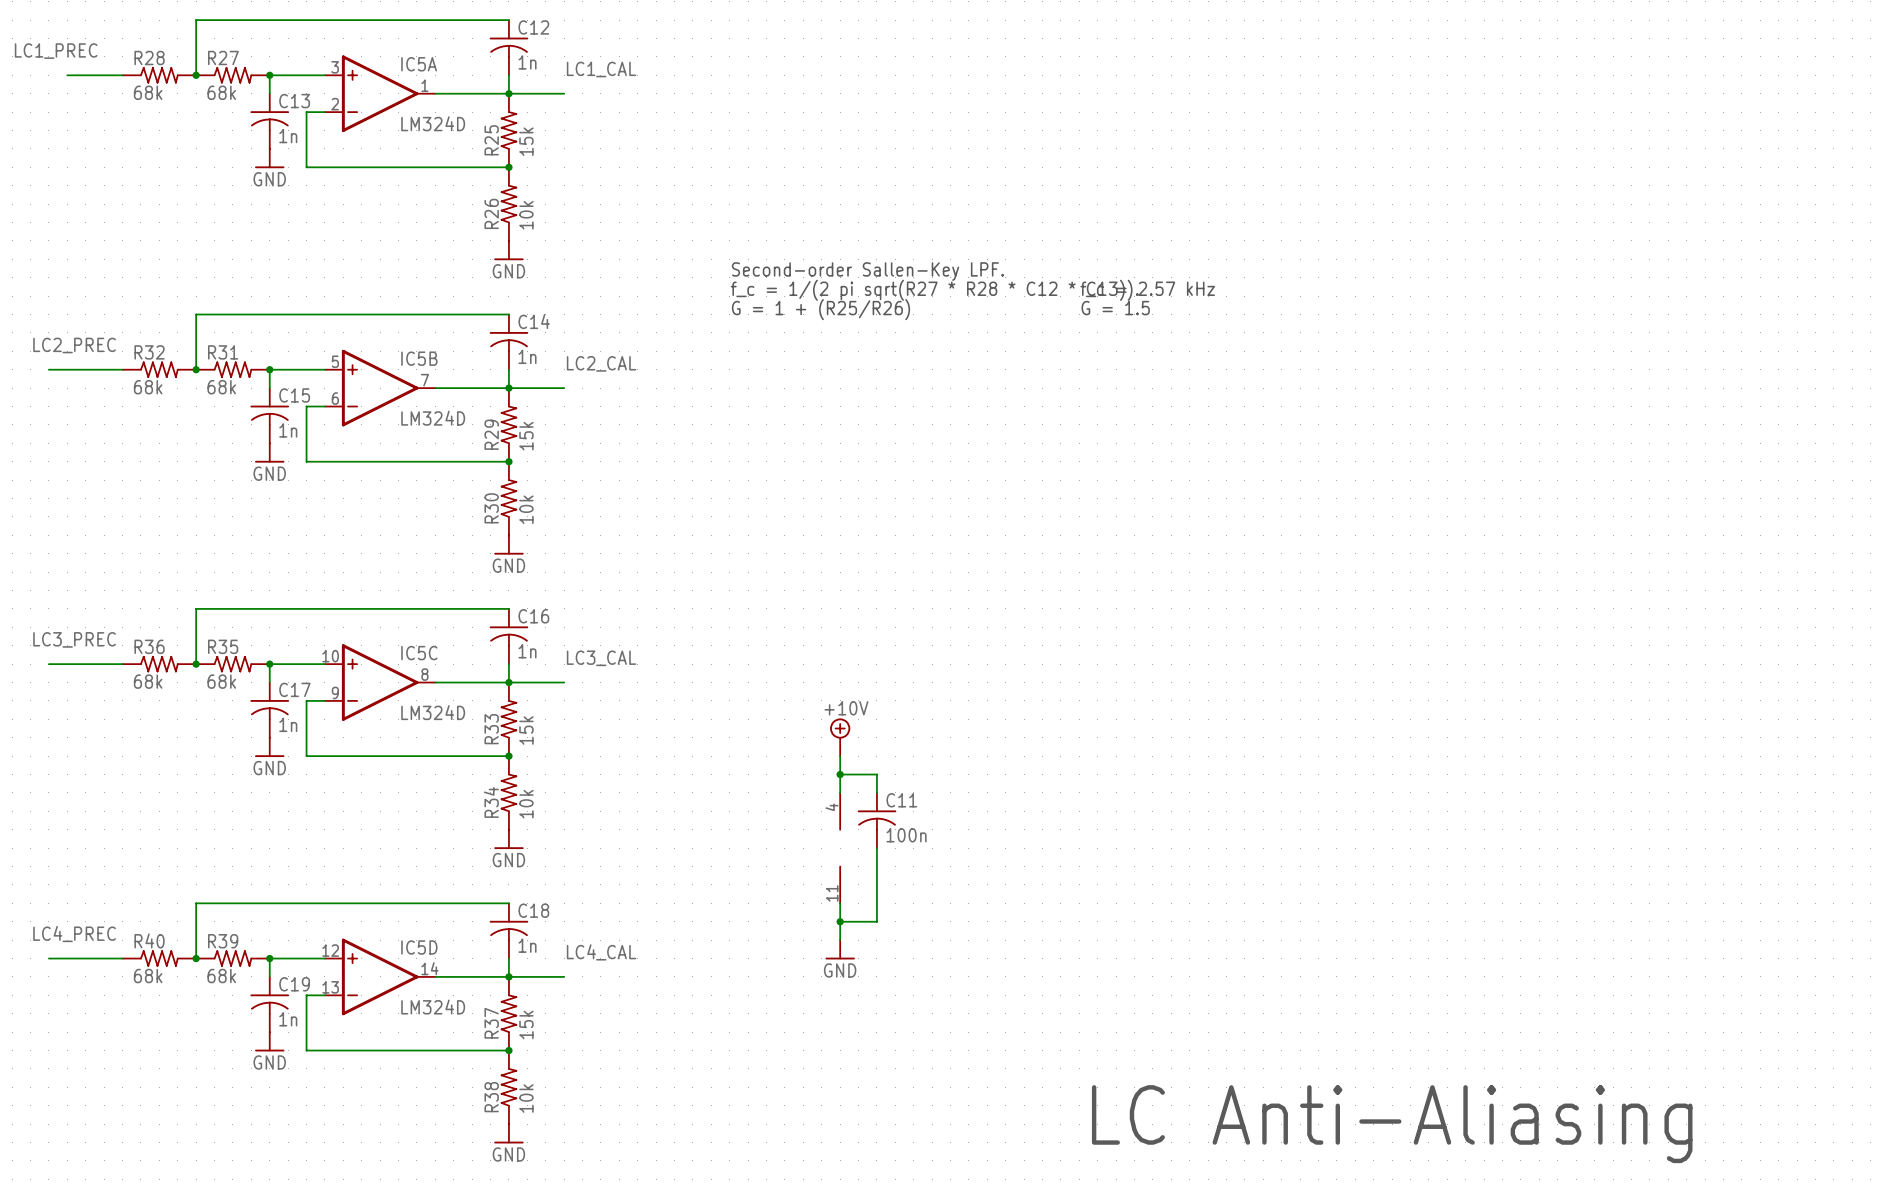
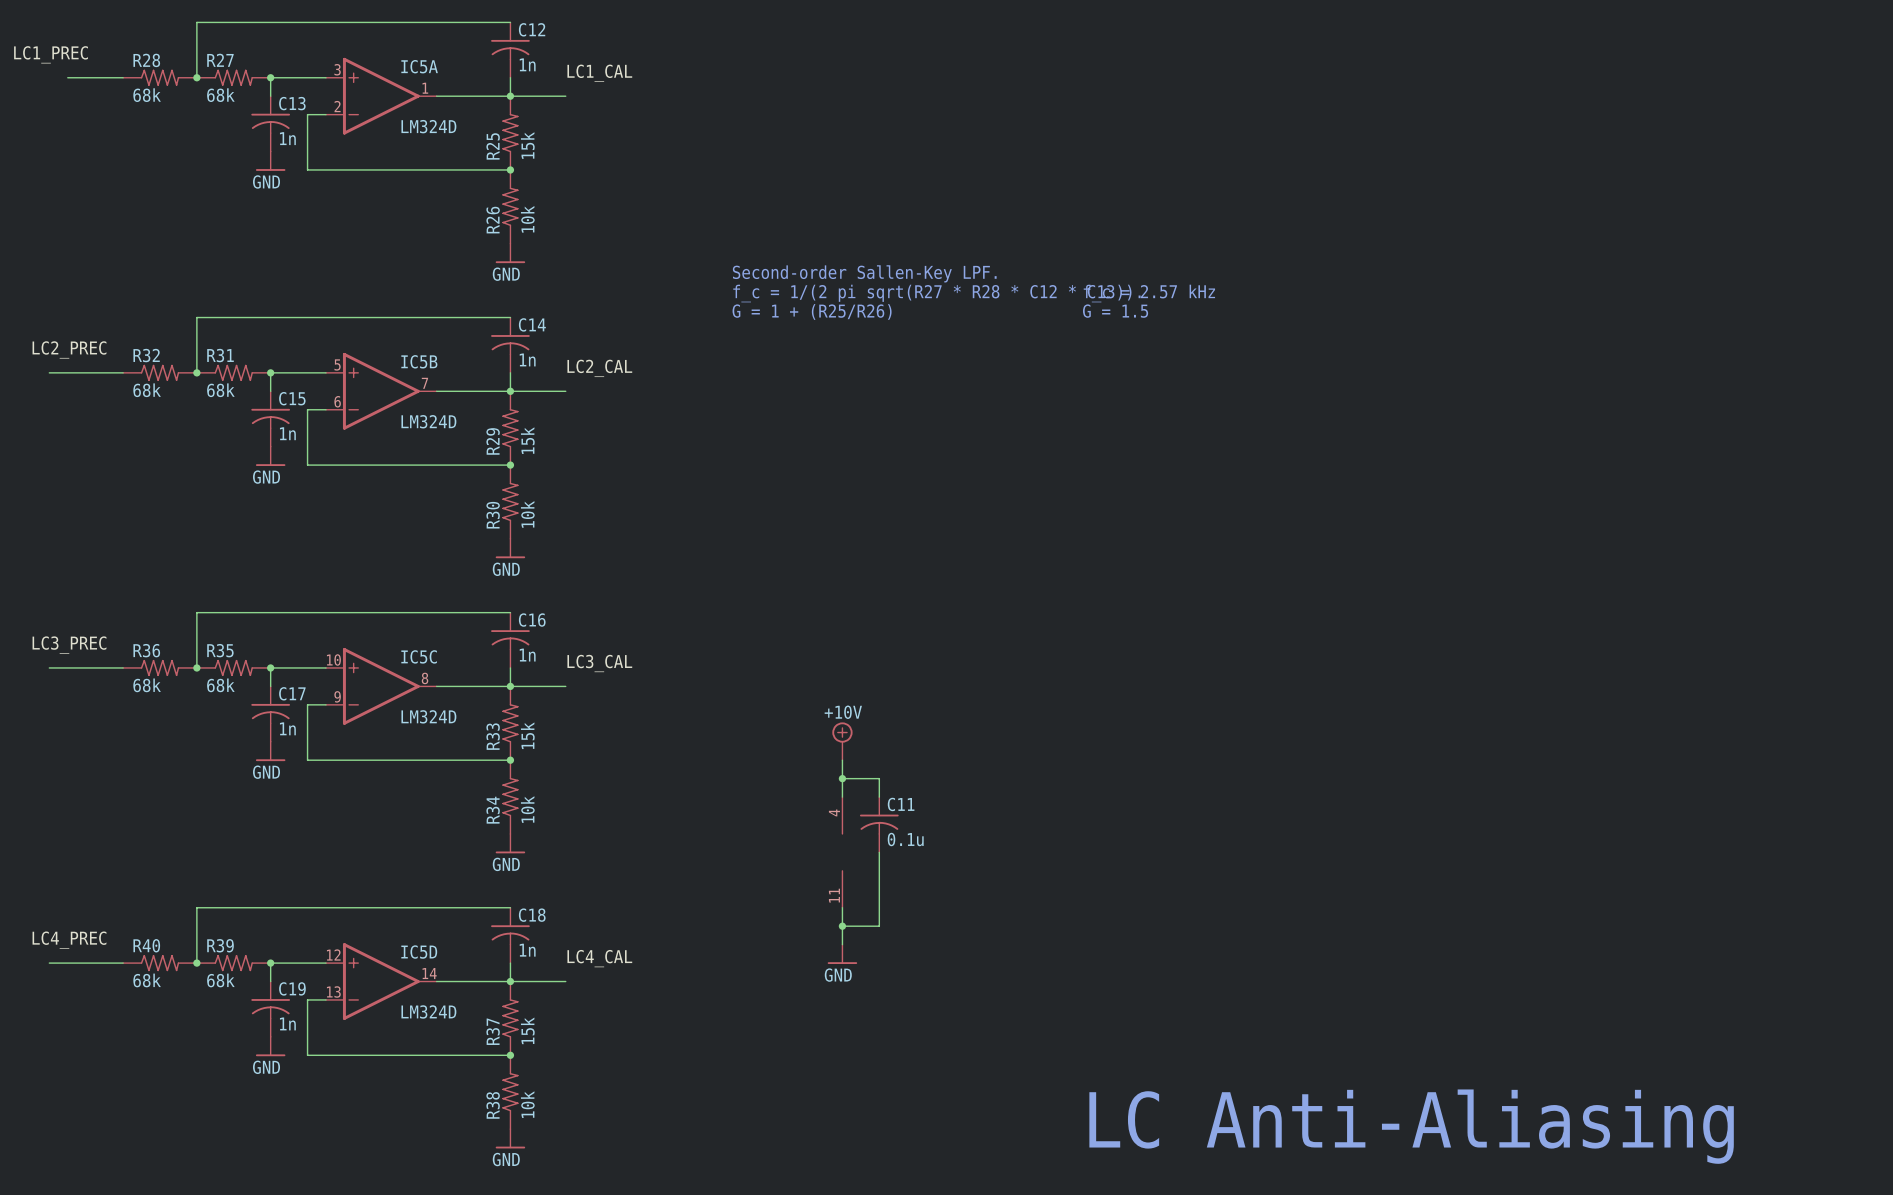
C11 value: 100n (906, 835) -> 0.1u (905, 839)

